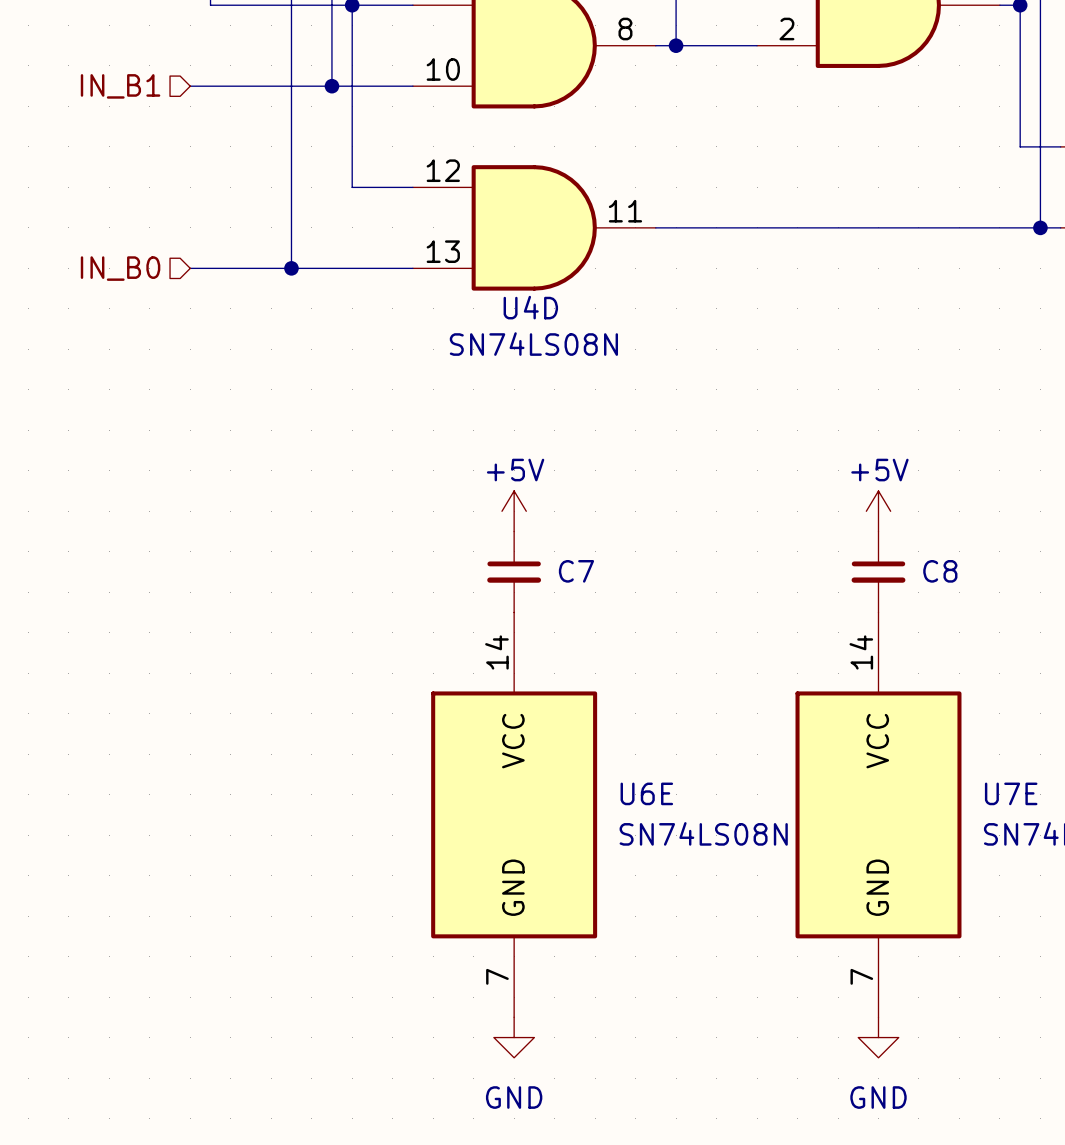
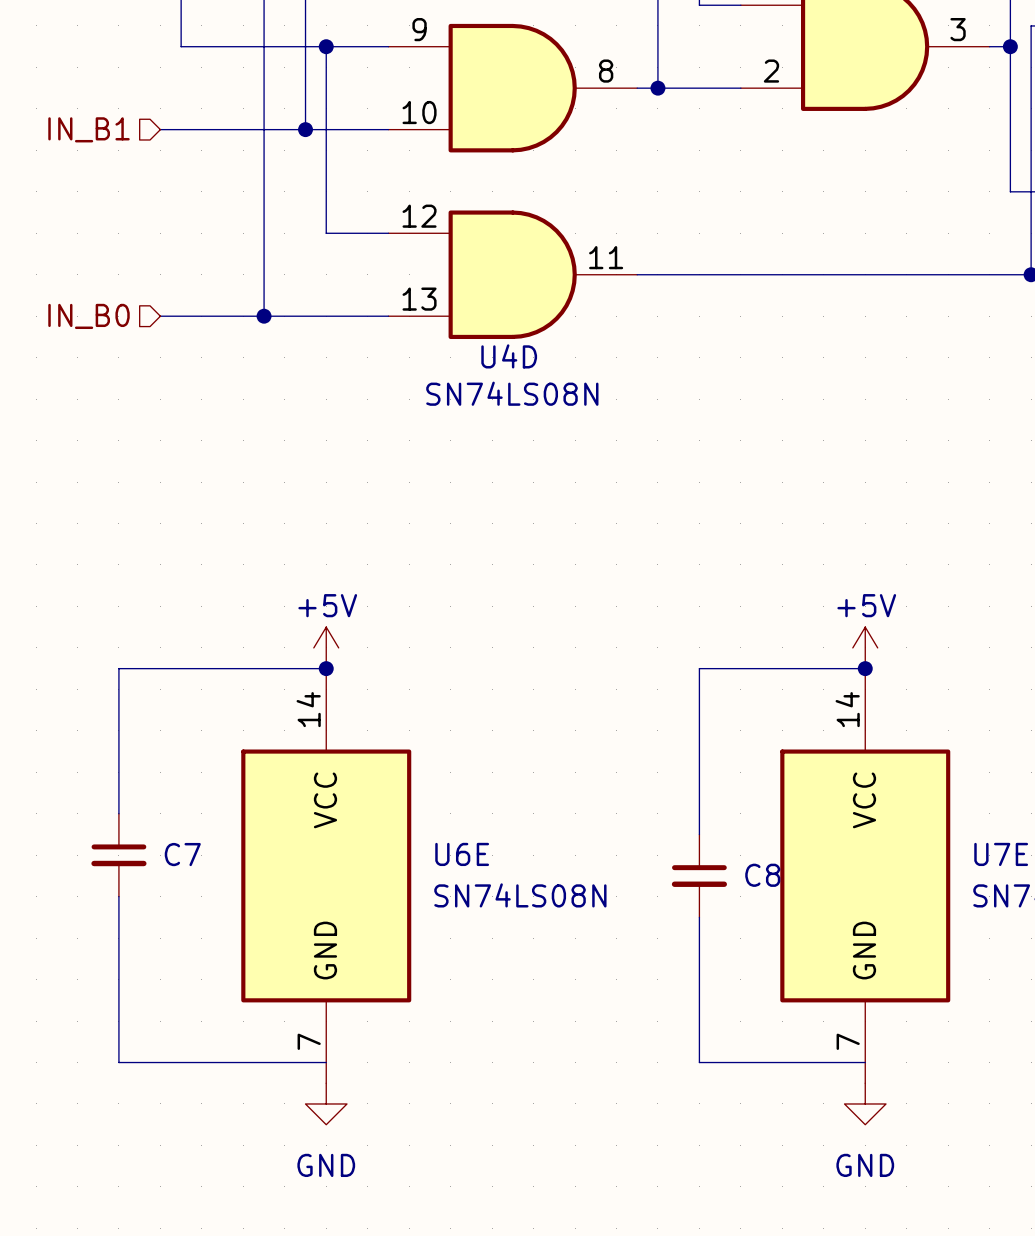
power symbol position: +5V (514, 511) -> +5V (326, 647)
power symbol position: +5V (878, 511) -> +5V (865, 647)
C7 position: (514, 571) -> (118, 855)
C8 position: (878, 571) -> (699, 875)
wire: none -> (326, 668) (118, 668) (118, 813)
junction: none -> (326, 668)
wire: none -> (865, 668) (699, 668) (699, 834)
junction: none -> (865, 668)
U6E position: (514, 814) -> (326, 875)
wire: none -> (118, 896) (118, 1062) (326, 1062)
wire: none -> (699, 917) (699, 1062) (865, 1062)
power symbol position: GND (514, 1037) -> GND (326, 1103)

